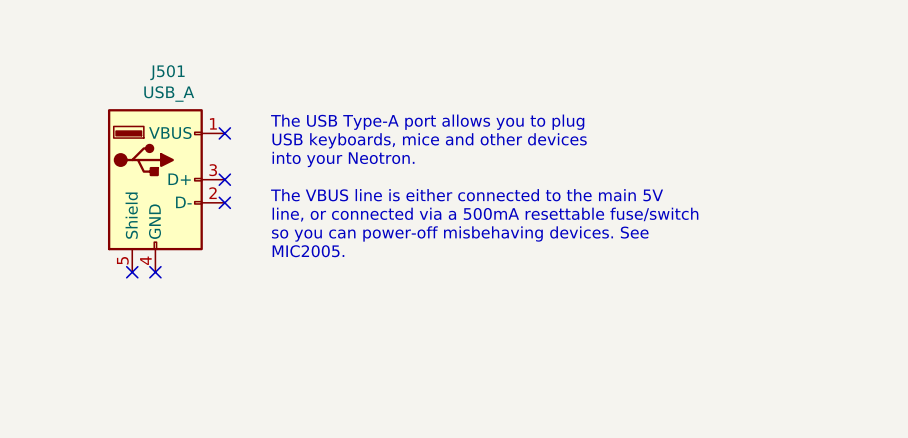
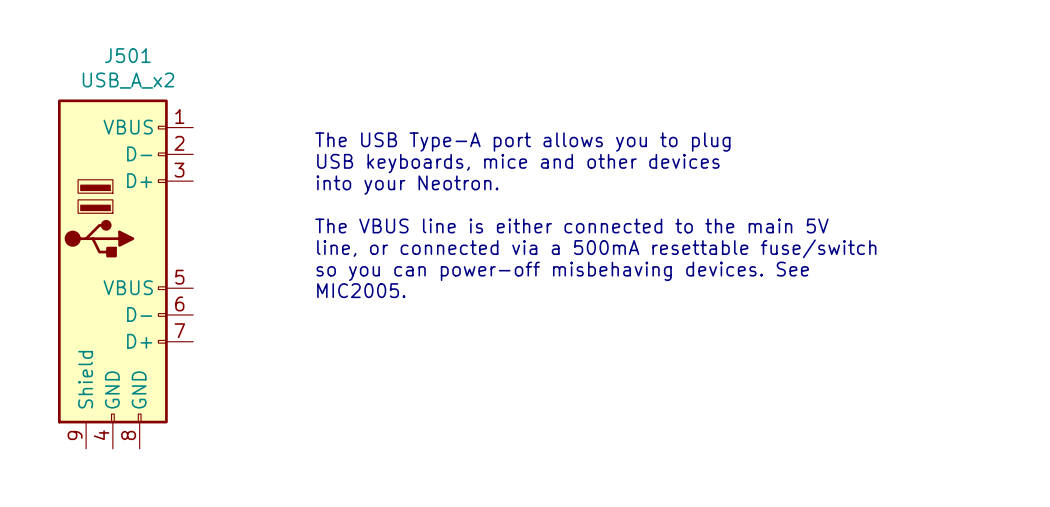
J501 name position: J501 (167, 72) -> J501 (127, 55)
J501 value: USB_A (169, 94) -> USB_A_x2 (128, 80)
J501 symbol: [107, 109, 225, 273] -> [58, 99, 194, 449]
no-connect mark: (224, 133) -> none
no-connect mark: (224, 179) -> none
no-connect mark: (224, 202) -> none
no-connect mark: (132, 272) -> none
no-connect mark: (155, 272) -> none

